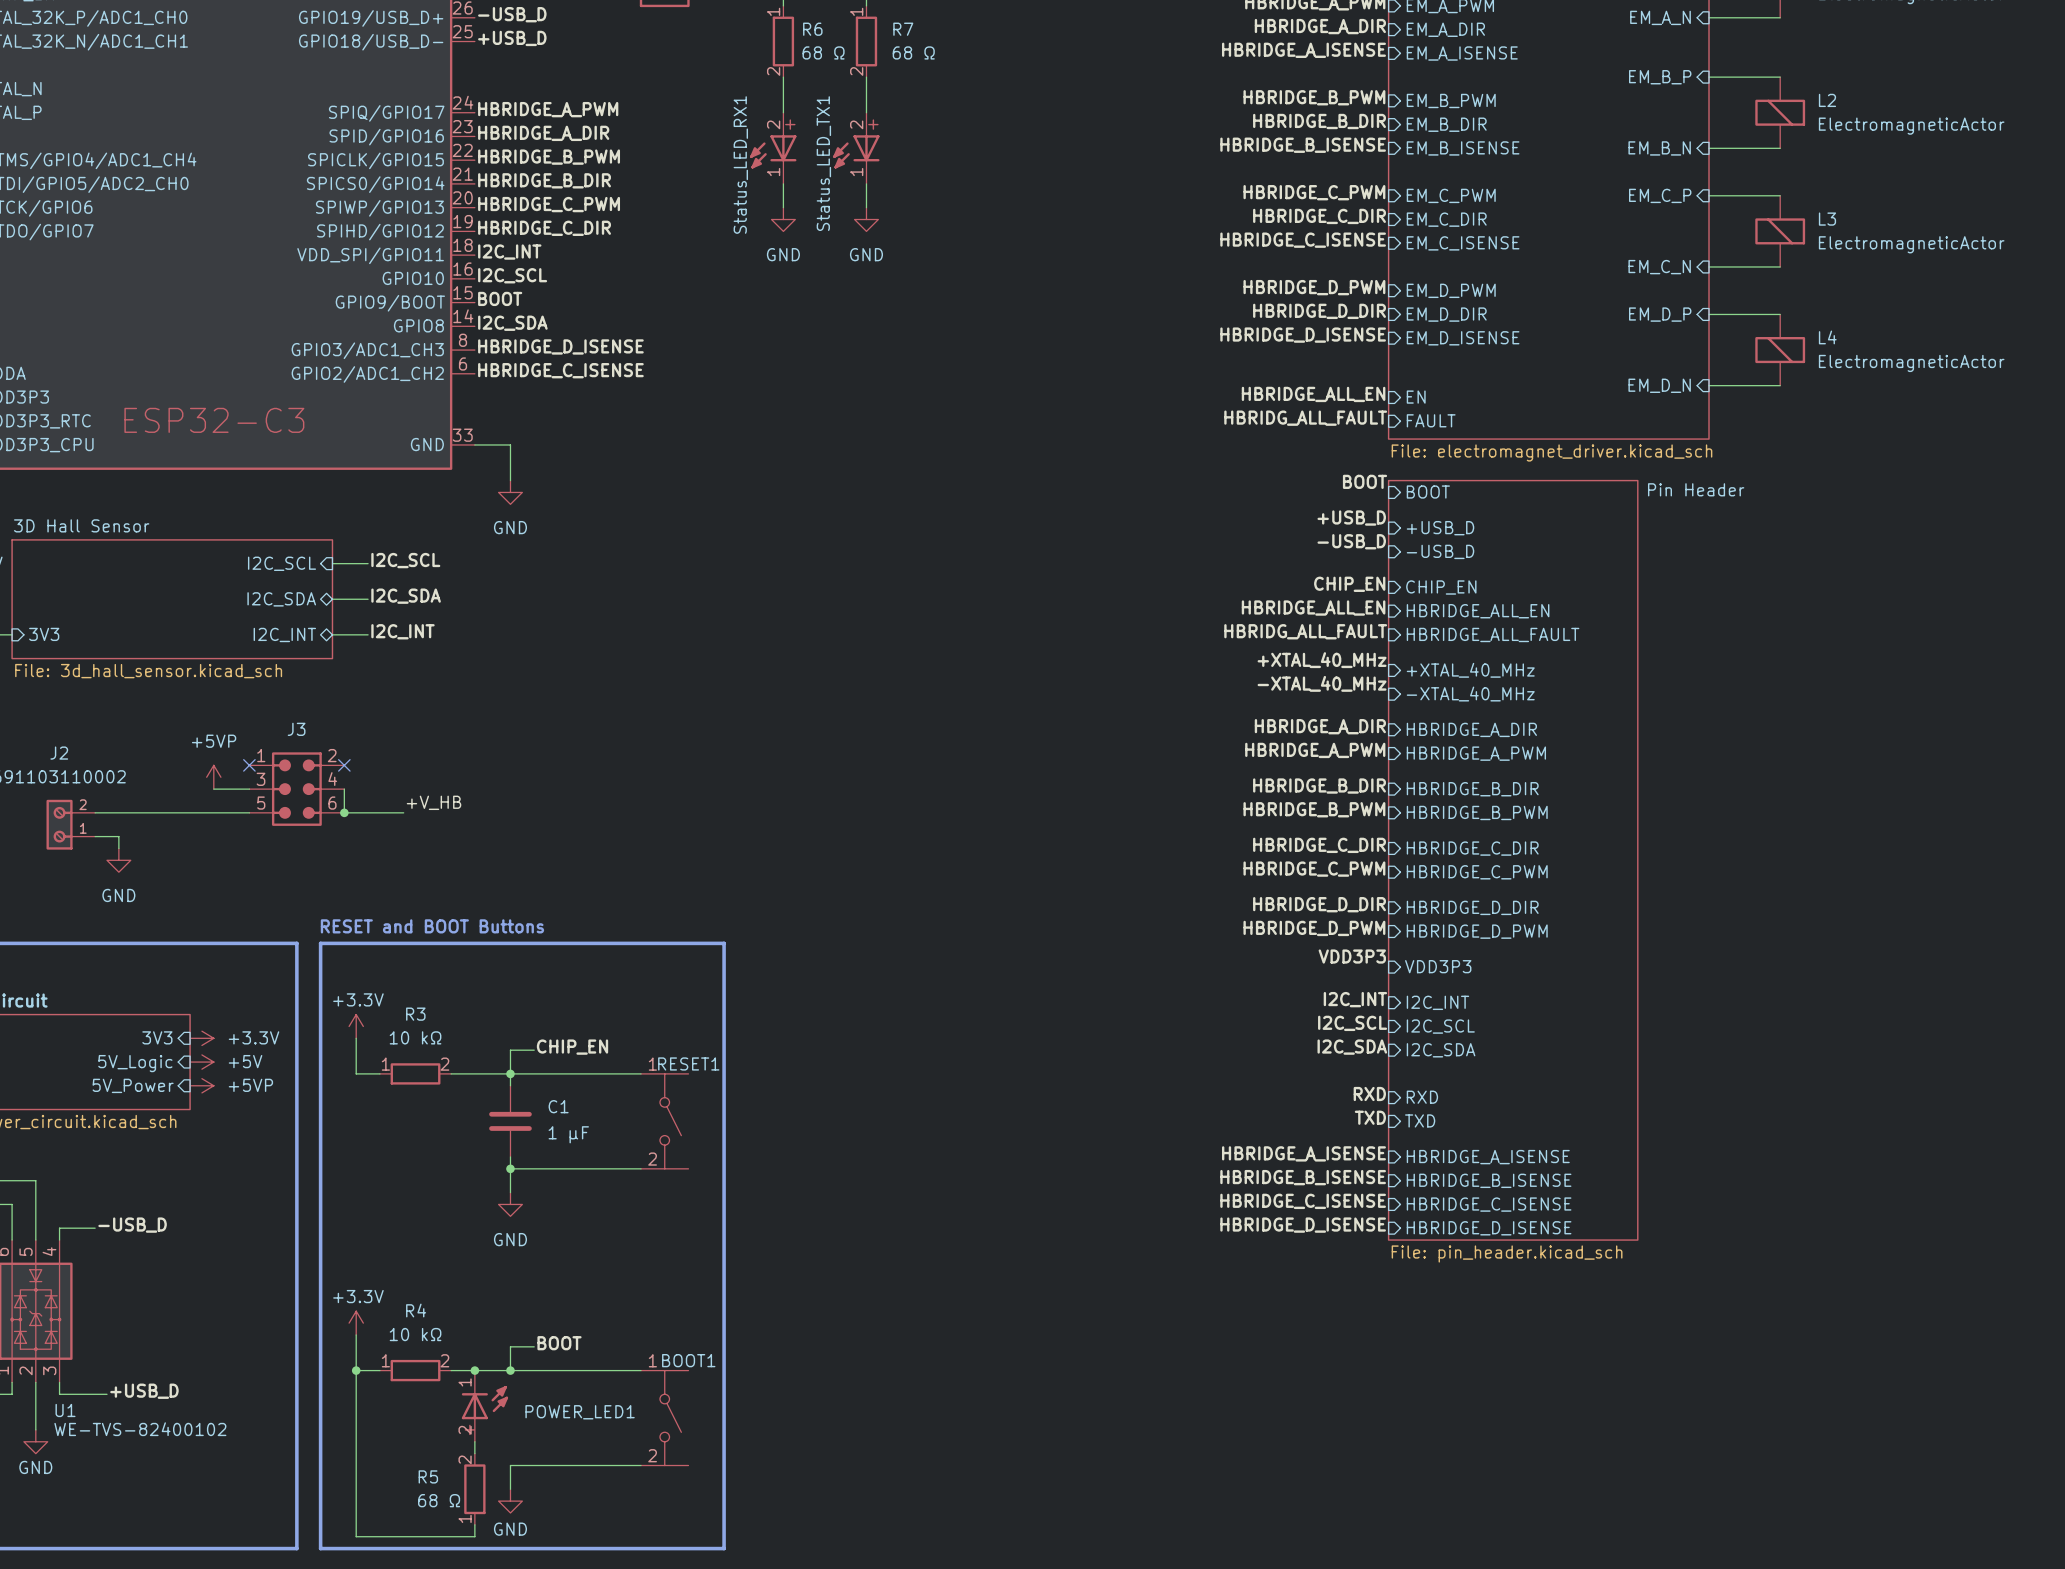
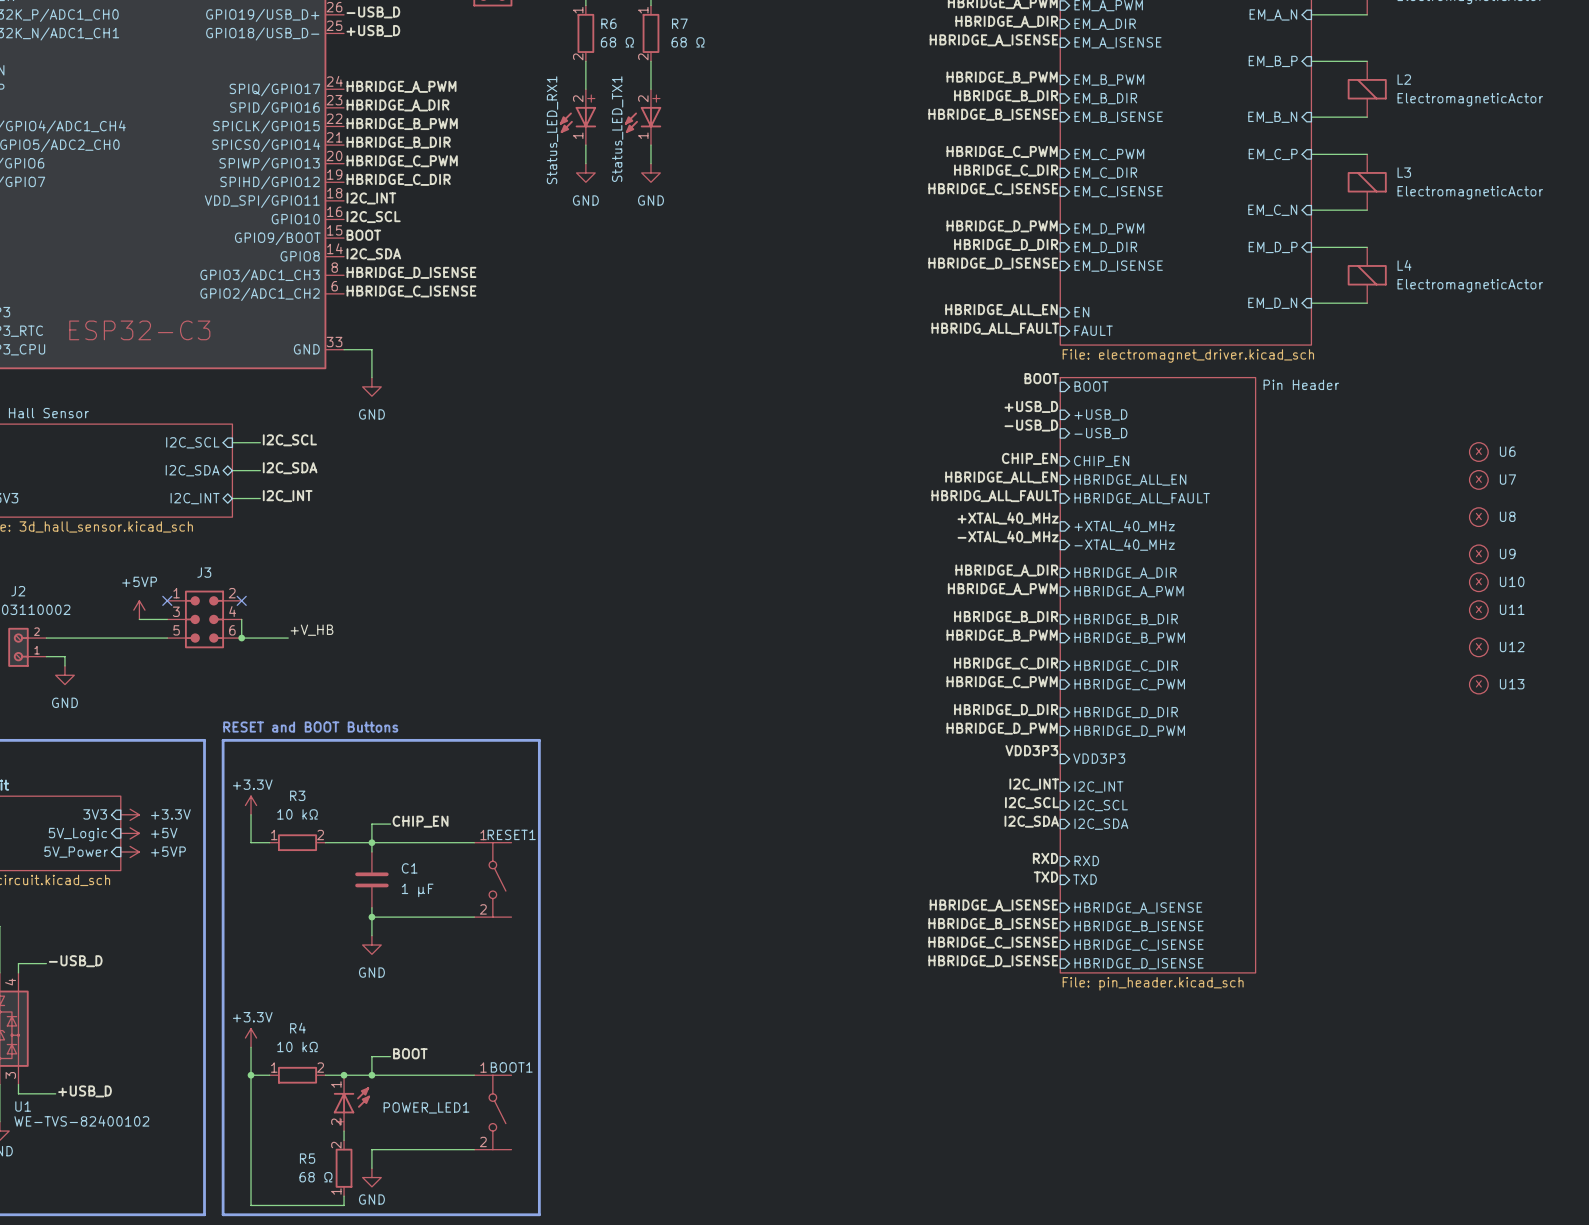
U6: none -> (1478, 452)
U7: none -> (1478, 479)
U8: none -> (1478, 517)
U9: none -> (1478, 554)
U10: none -> (1478, 582)
U11: none -> (1478, 610)
U12: none -> (1478, 647)
U13: none -> (1478, 684)

